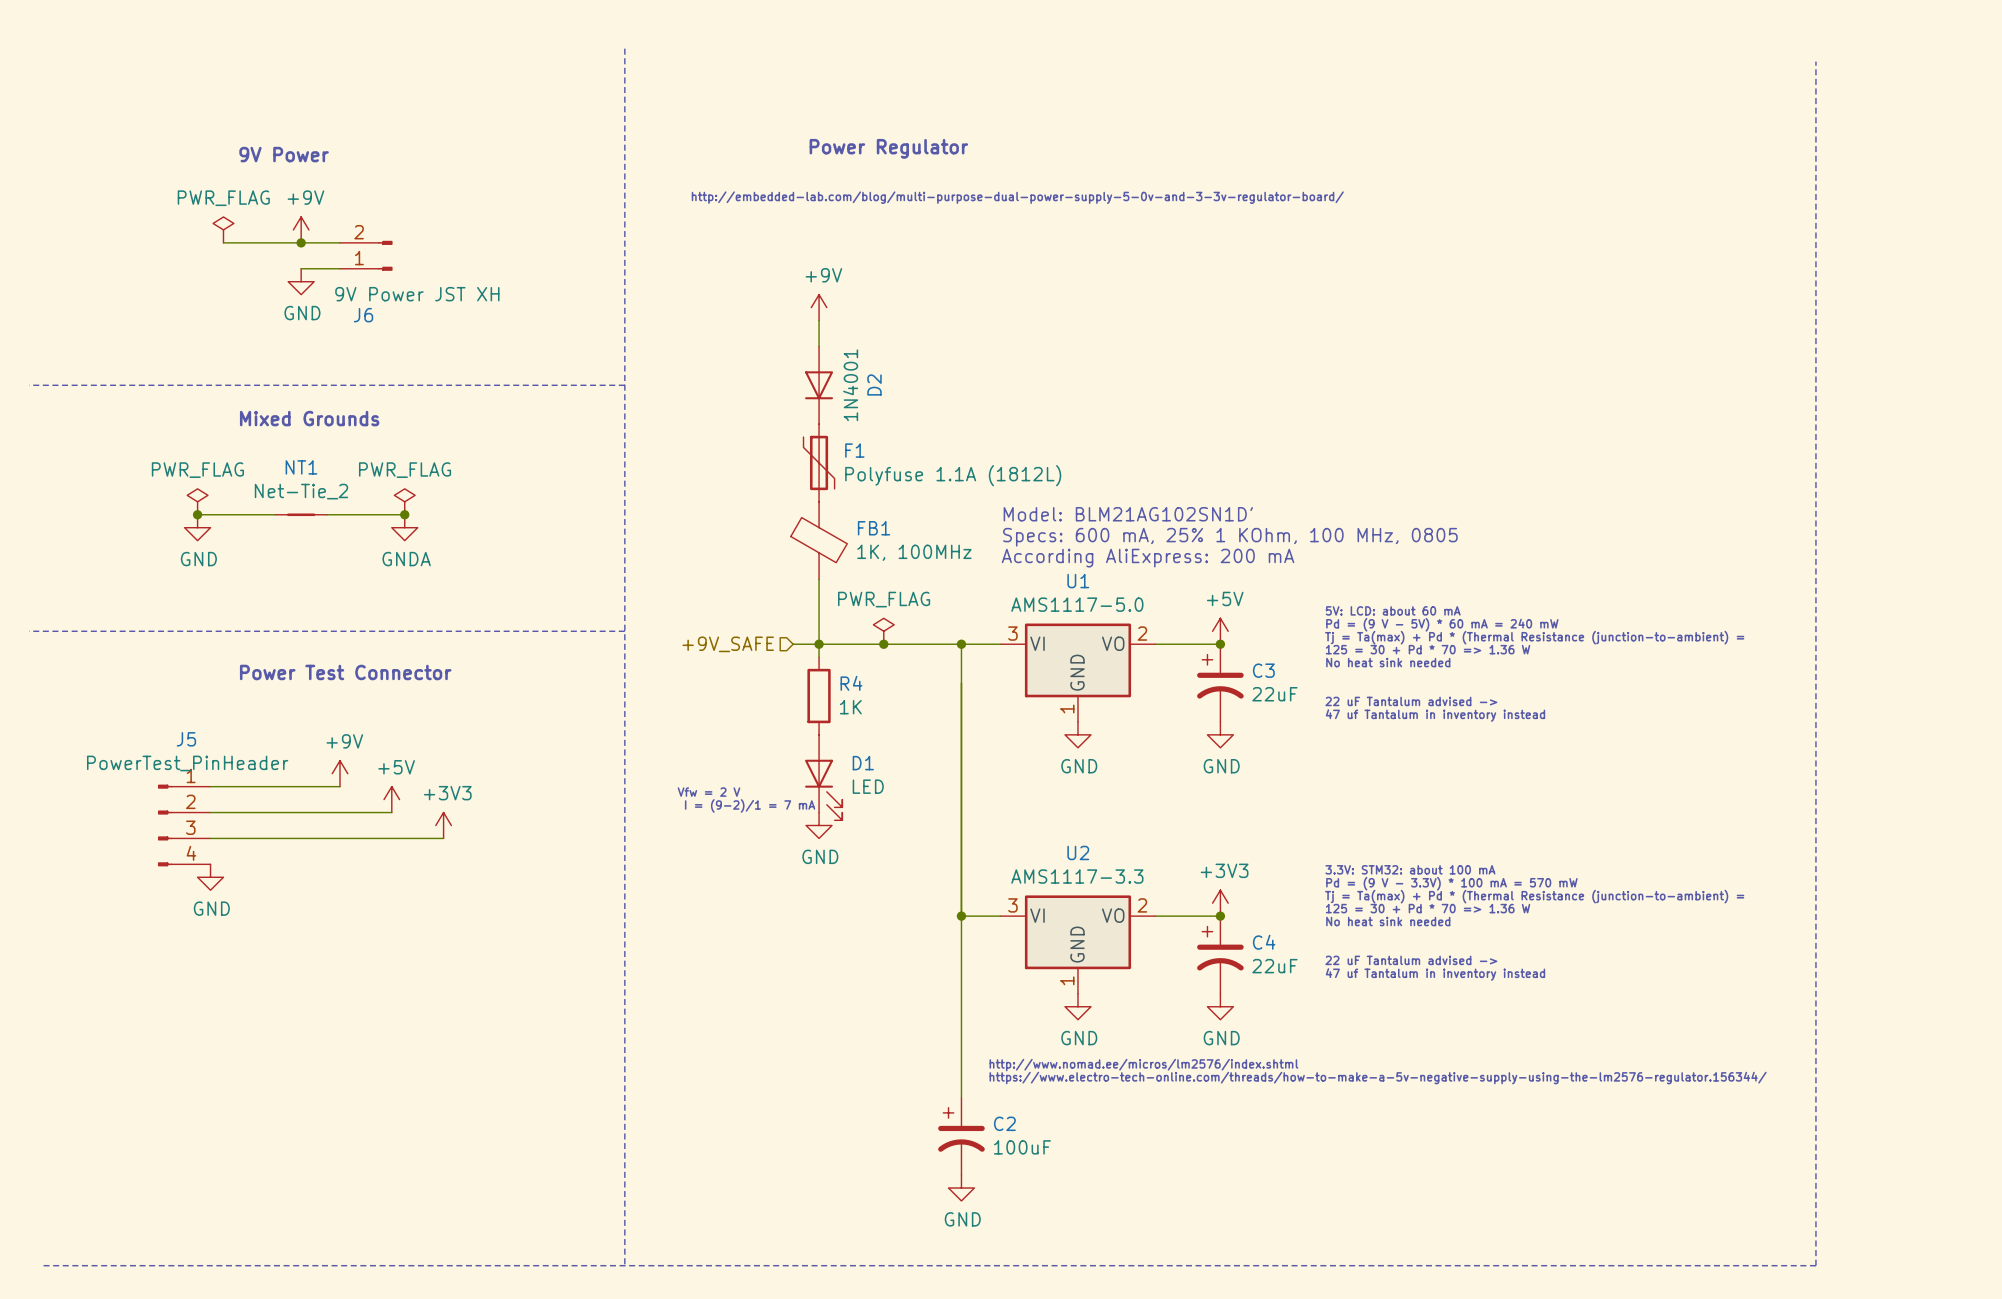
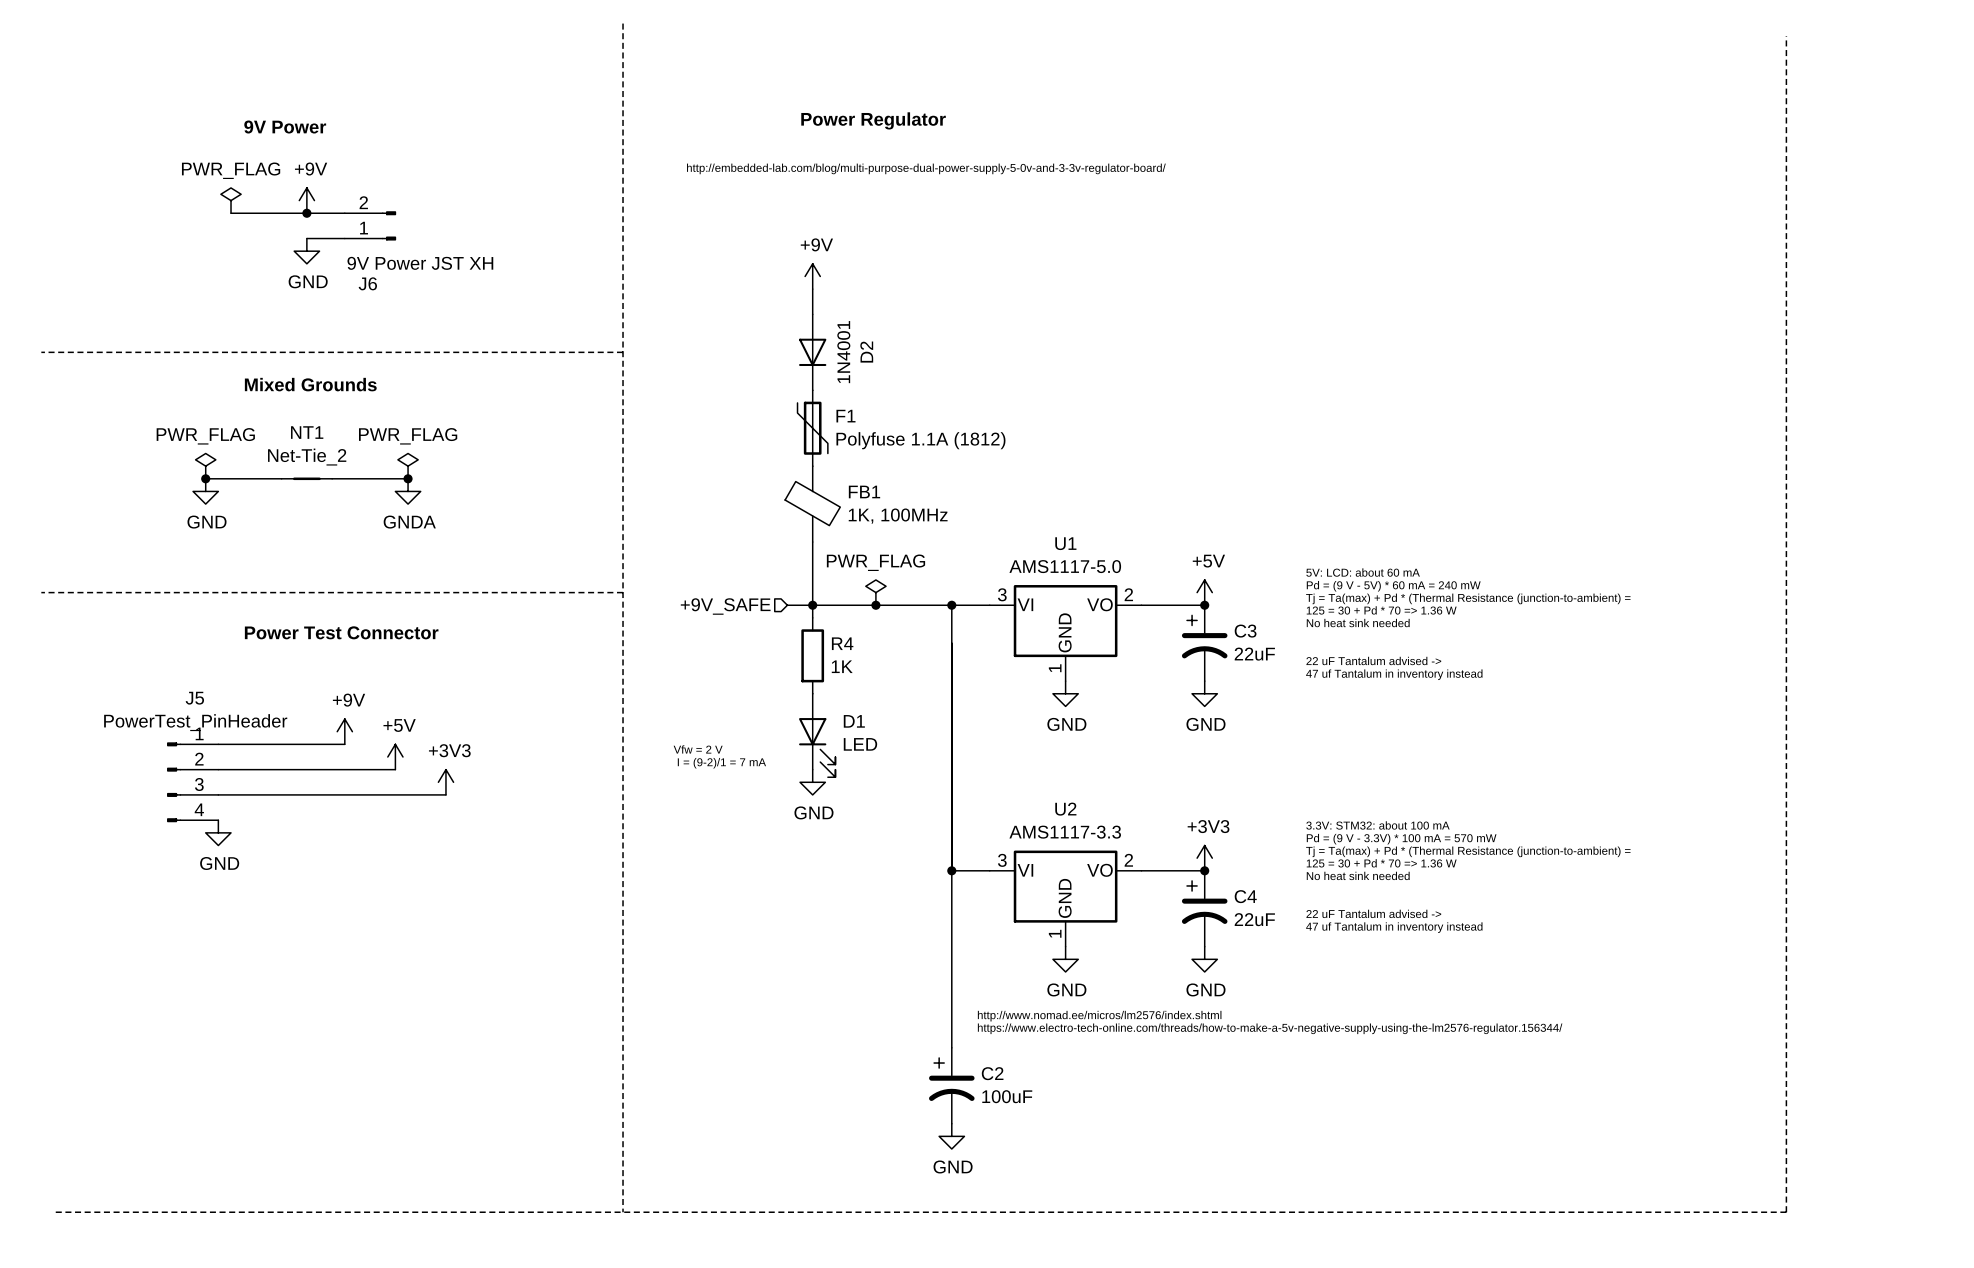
F1 value: Polyfuse 1.1A (1812L) (953, 475) -> Polyfuse 1.1A (1812) (920, 440)
text: Model: BLM21AG102SN1D' (1128, 514) -> none
text: Specs: 600 mA, 25% 1 KOhm, 100 MHz, 0805 (1230, 537) -> none
text: According AliExpress: 200 mA (1148, 558) -> none

